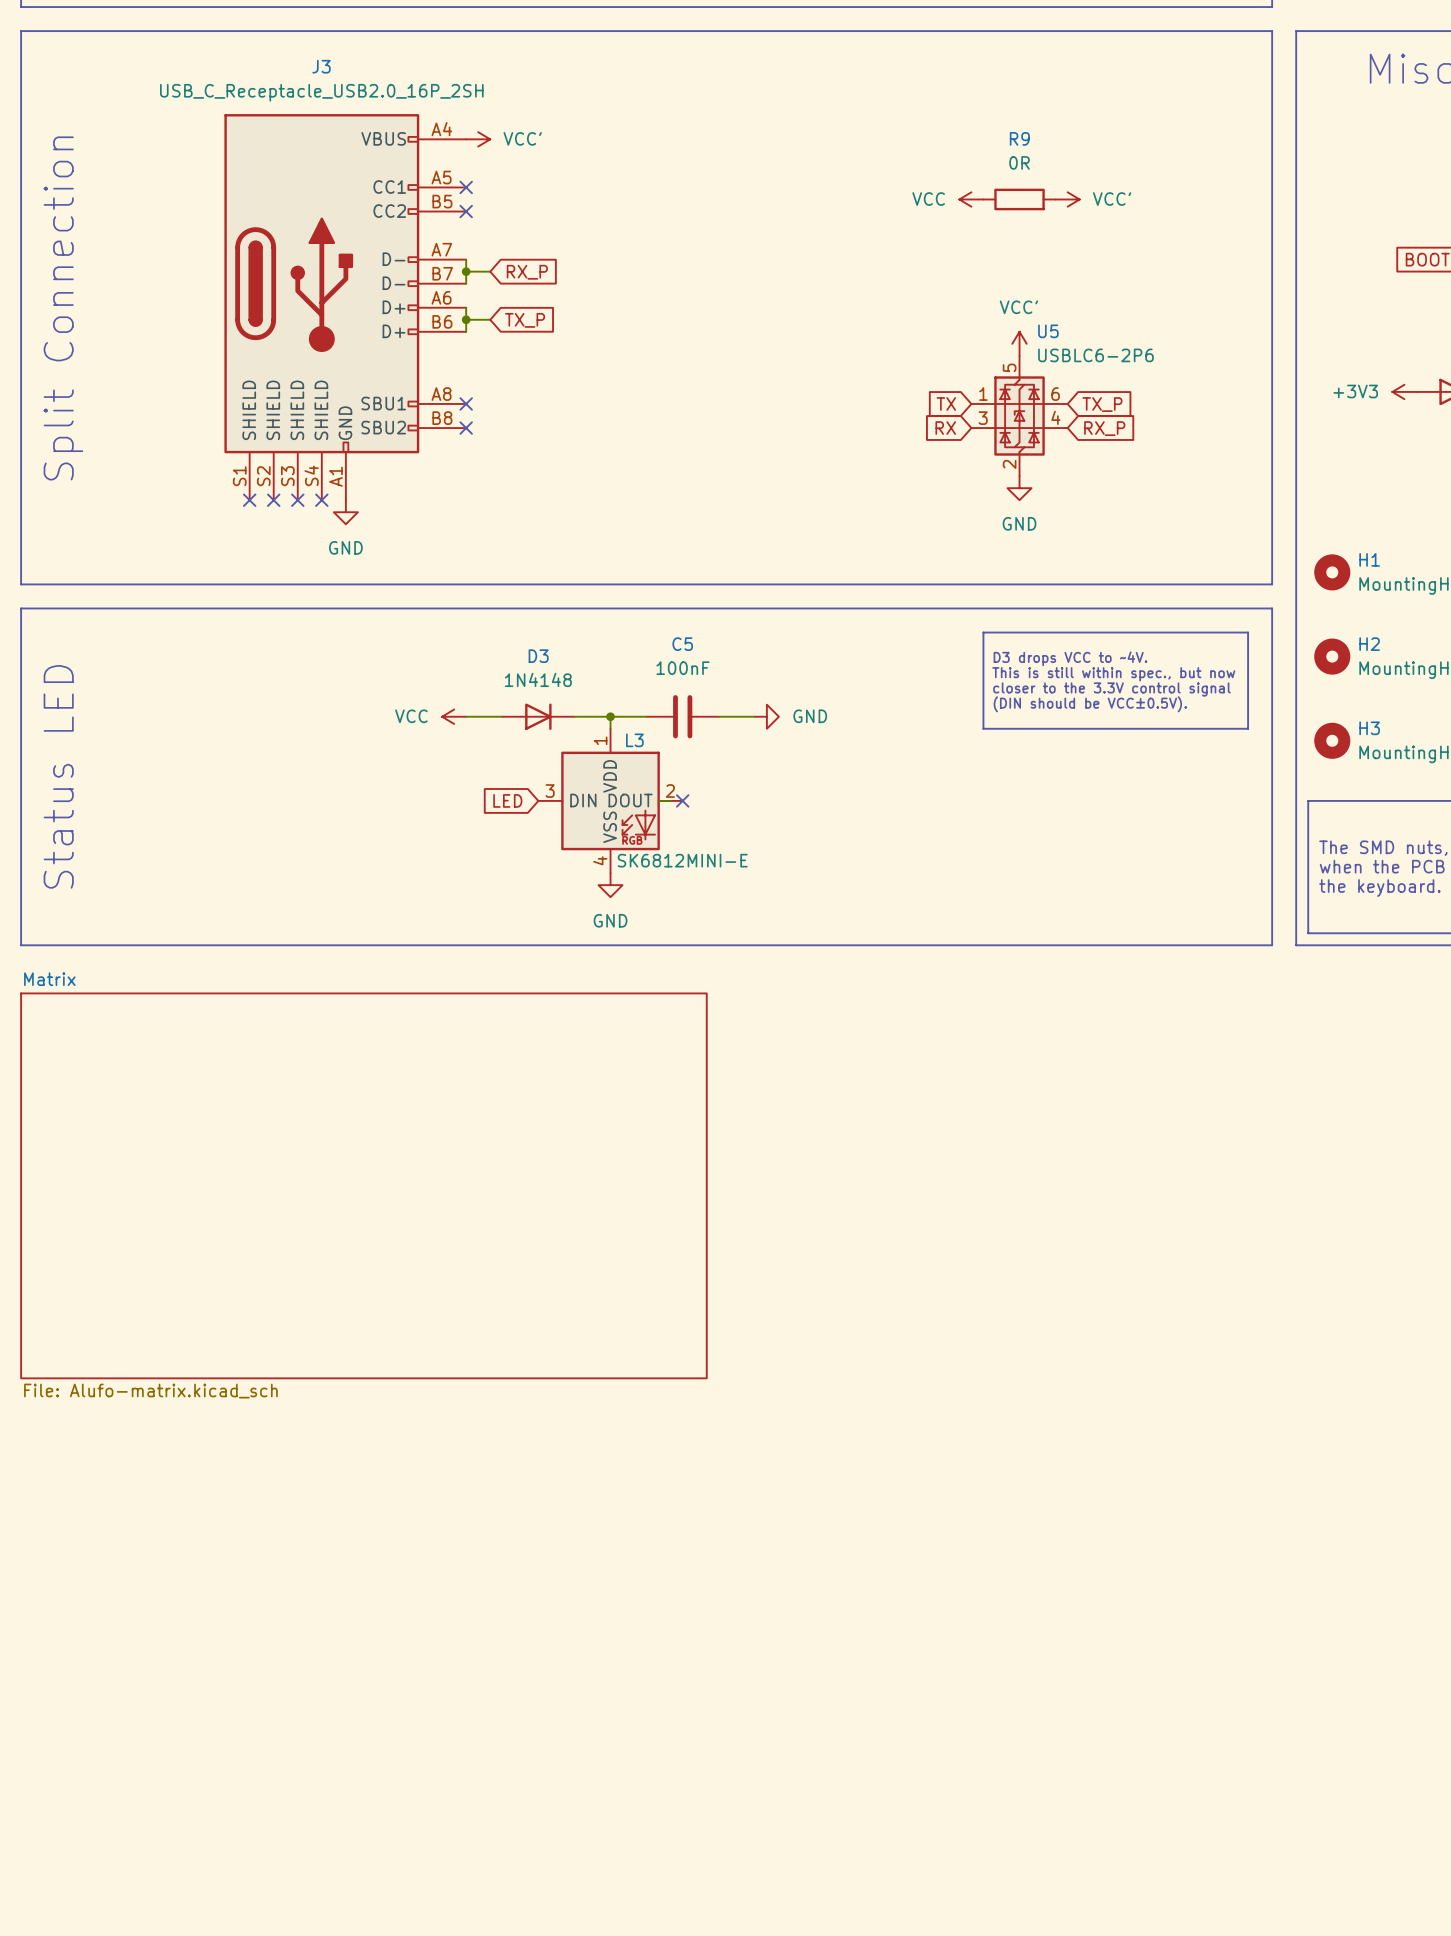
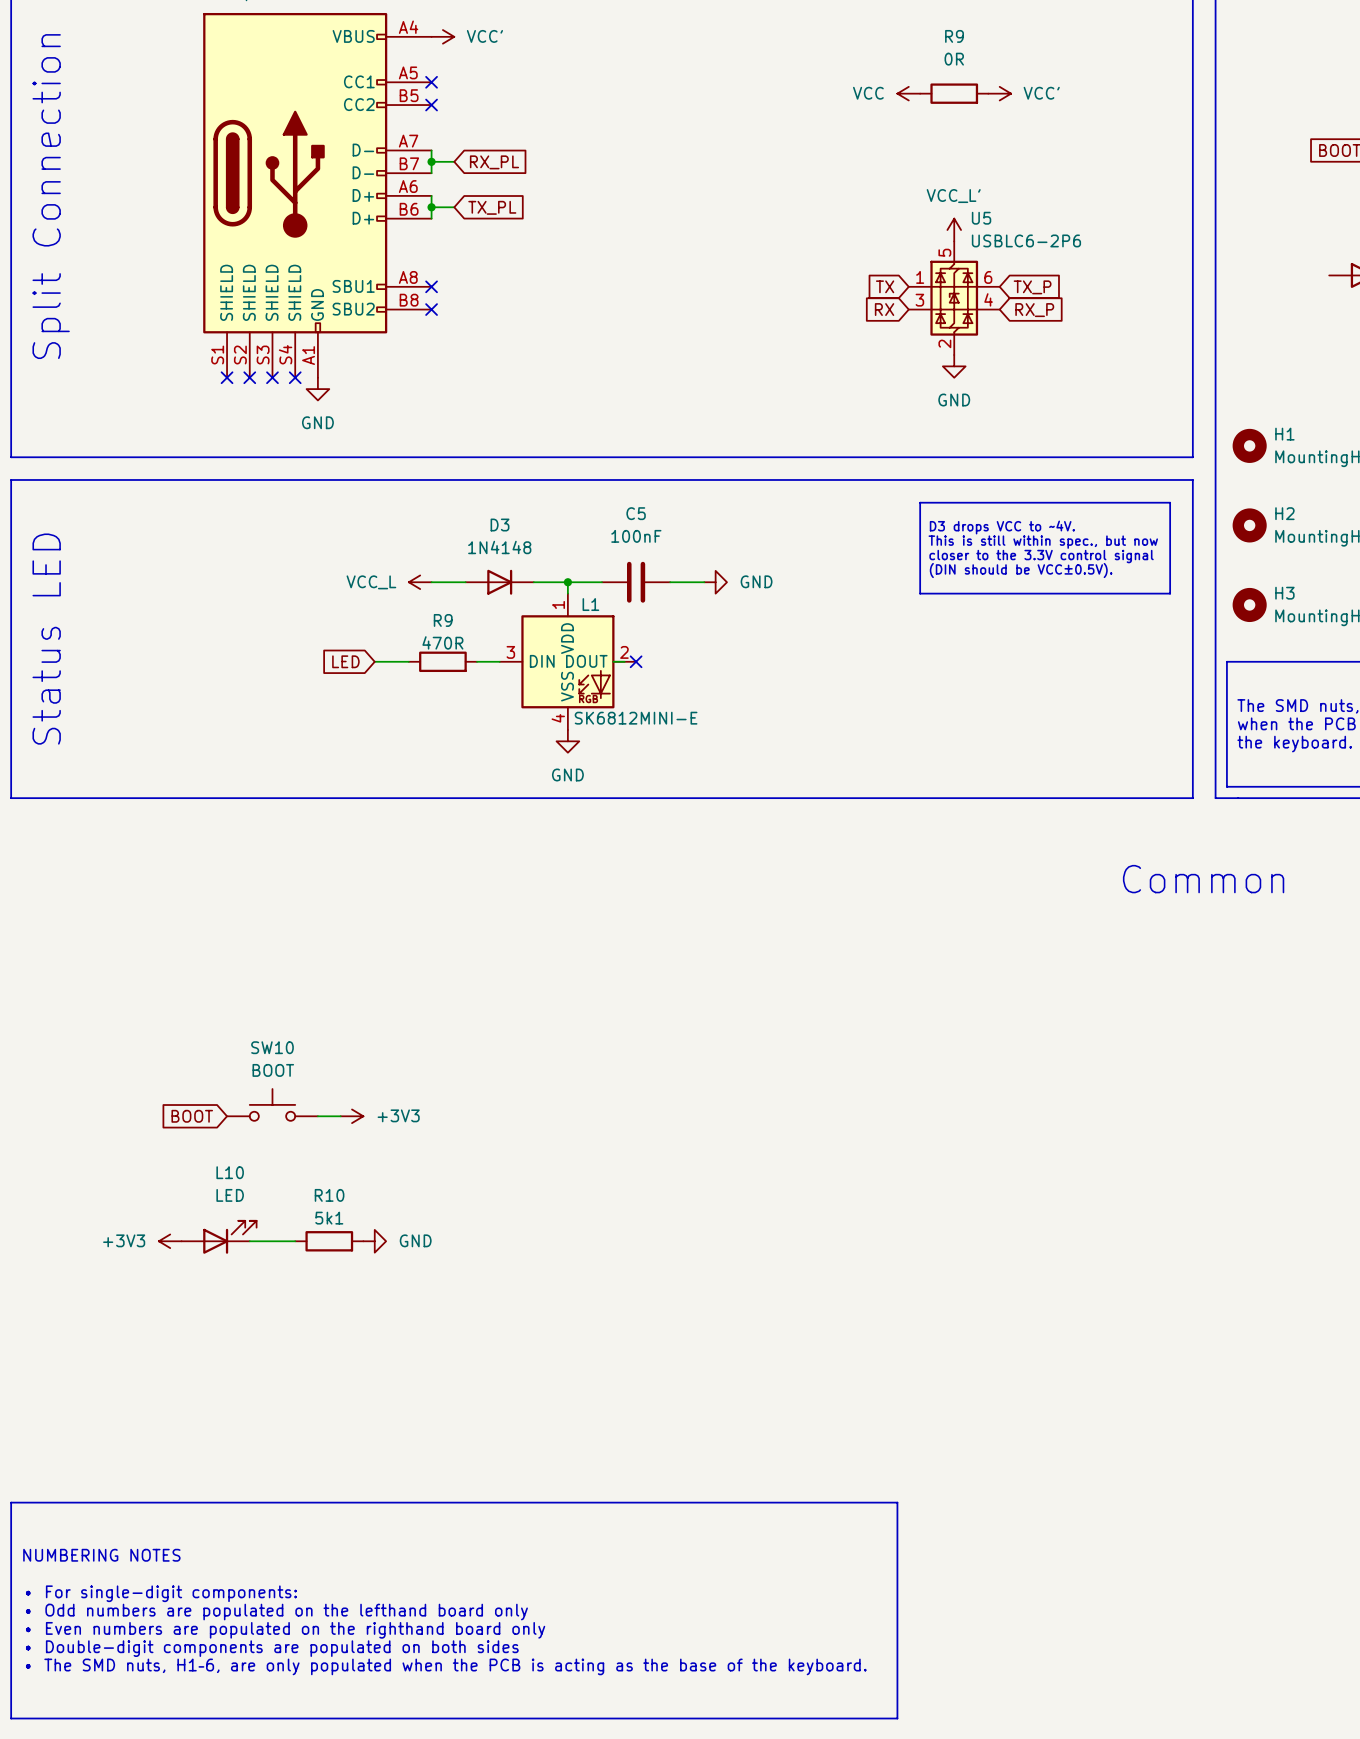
global label: RX_P (527, 272) -> RX_PL (494, 162)
global label: TX_P (525, 320) -> TX_PL (492, 207)
power symbol: VCC' (1019, 343) -> VCC_L' (954, 230)
power symbol: +3V3 (1404, 391) -> none
power symbol: VCC (454, 716) -> VCC_L (420, 582)
L3 name: L3 (634, 740) -> L1 (590, 604)
wire: none -> (374, 661) (408, 661)
R9: none -> 470R (442, 661)
global label position: LED (507, 800) -> LED (345, 661)
wire: none -> (477, 661) (499, 661)
text: none -> Common (1203, 879)
sheet Matrix: File: Alufo-matrix.kicad_sch (363, 1185) -> none
SW10: none -> BOOT (272, 1104)
global label: none -> BOOT (192, 1116)
wire: none -> (317, 1116) (340, 1116)
power symbol: none -> +3V3 (352, 1116)
L10: none -> LED (219, 1237)
power symbol: none -> +3V3 (170, 1241)
wire: none -> (249, 1241) (295, 1241)
R10: none -> 5k1 (329, 1241)
power symbol: none -> GND (374, 1241)
line: none -> (11, 1502) (11, 1718) (897, 1718) (897, 1502) (11, 1502)
text: none -> NUMBERING NOTES (101, 1555)
text: none -> • For single-digit components: (161, 1593)
text: none -> • Odd numbers are populated on the lefthand board only (276, 1612)
text: none -> • Even numbers are populated on the righthand board only (285, 1630)
text: none -> • Double-digit components are populated on both sides (272, 1648)
text: none -> • The SMD nuts, H1–6, are only populated when the PCB is acting as the base of the keyboard. (446, 1666)

